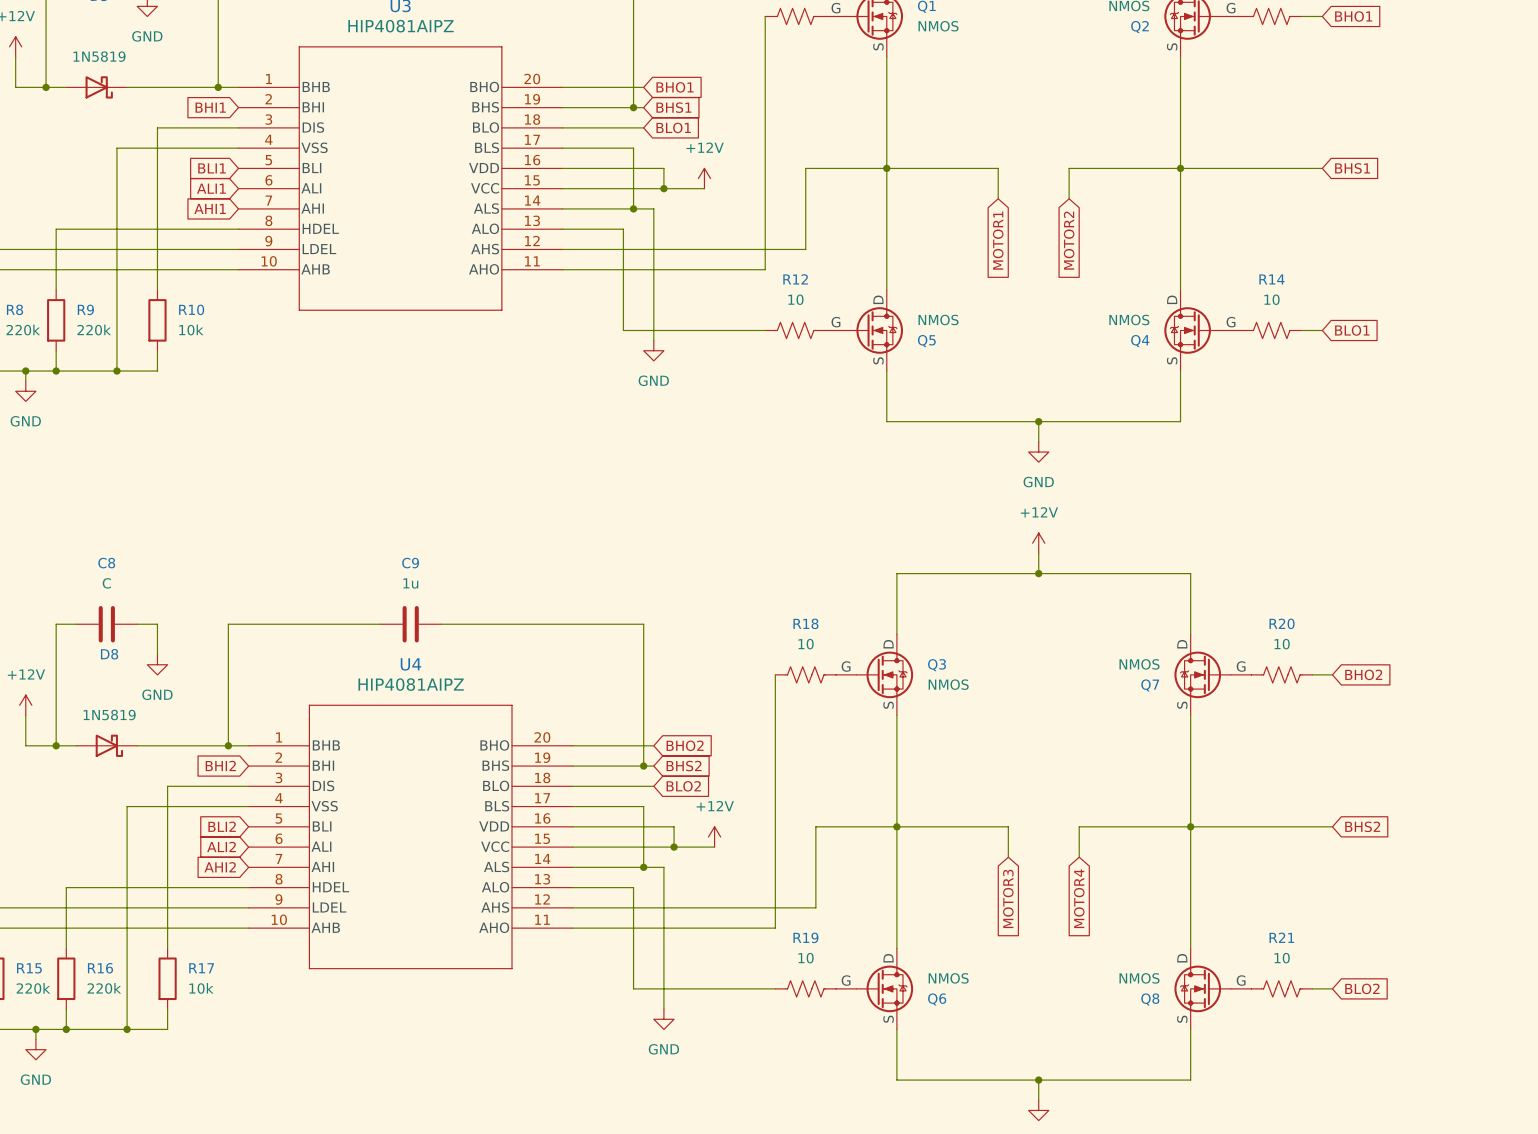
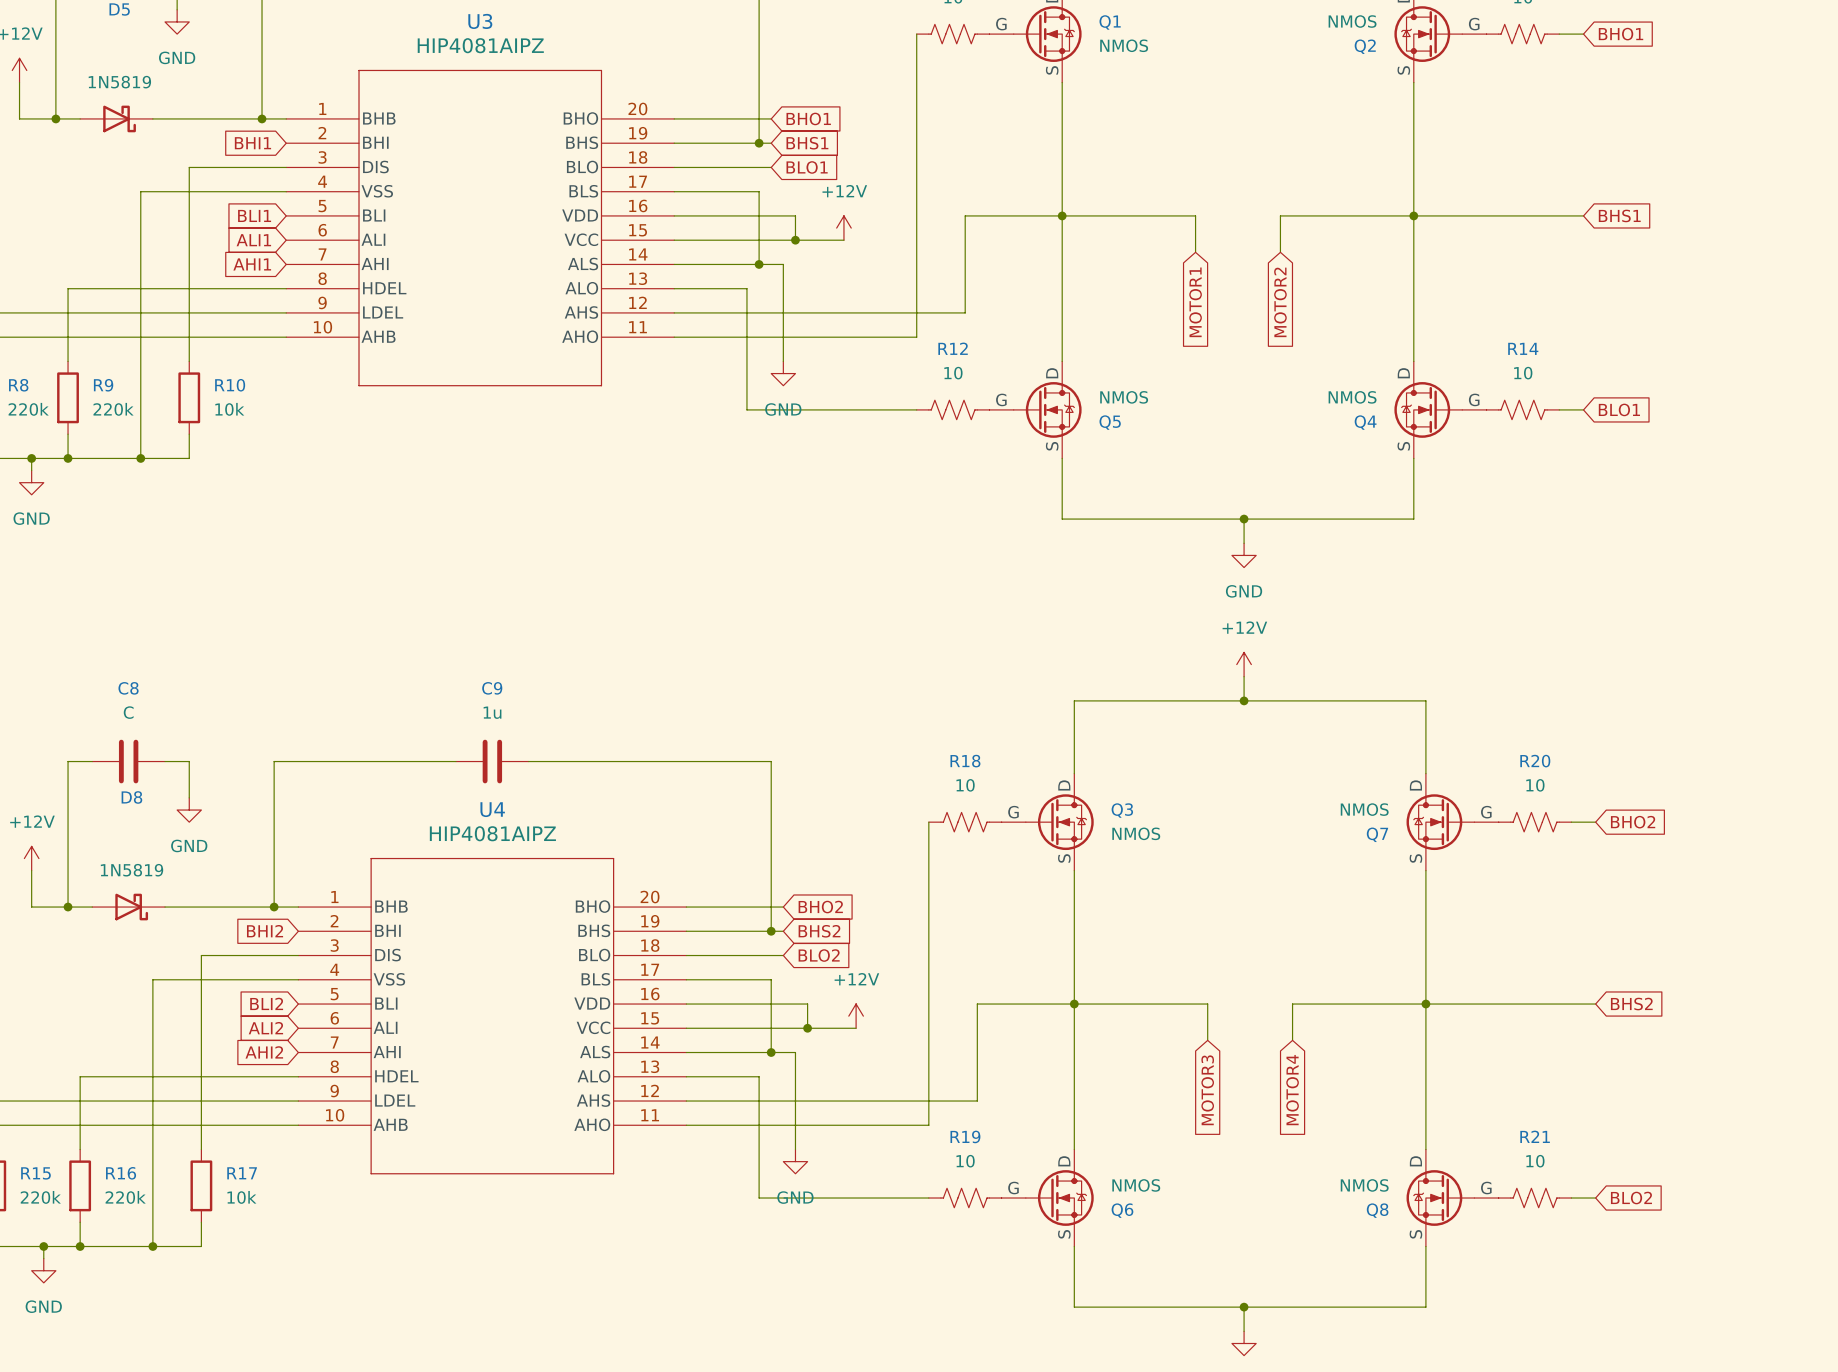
wire: (653, 289) (653, 340) -> none
power symbol position: GND (653, 350) -> GND (783, 373)
wire: (663, 948) (663, 1009) -> none
power symbol position: GND (663, 1019) -> GND (795, 1161)

